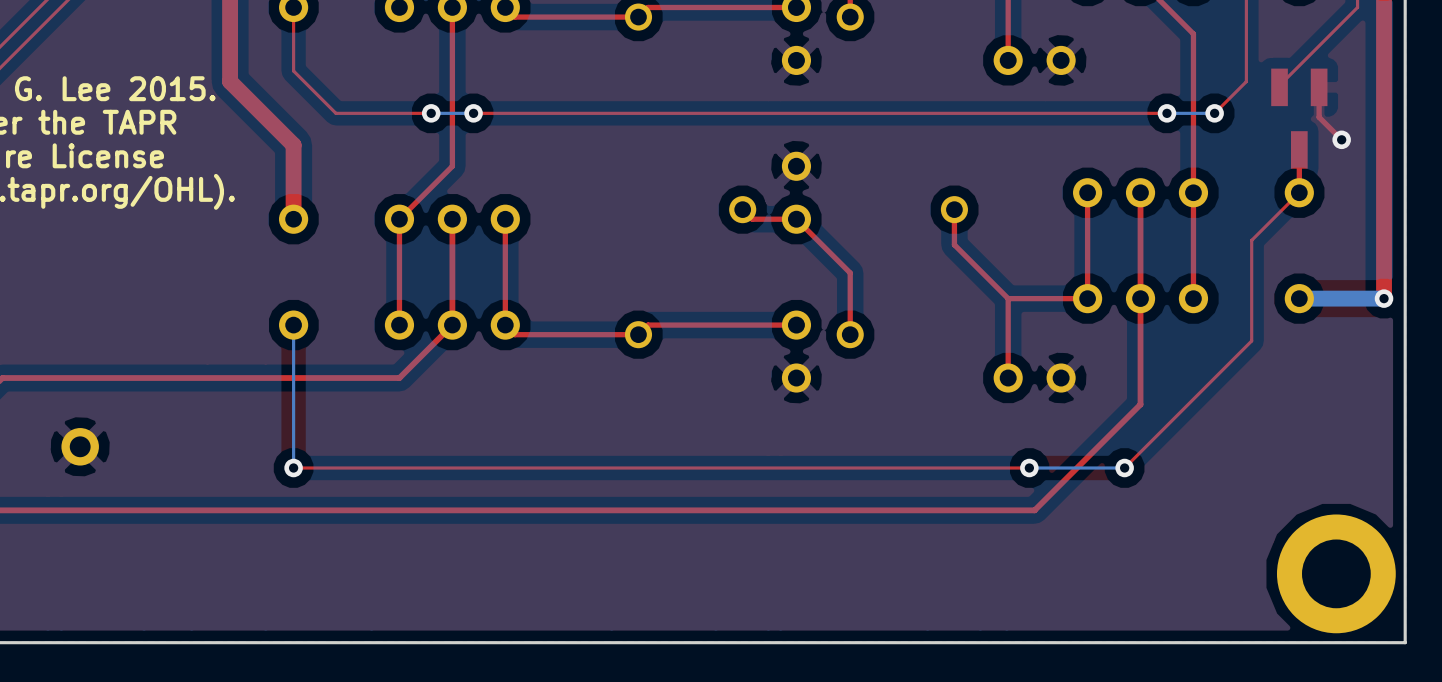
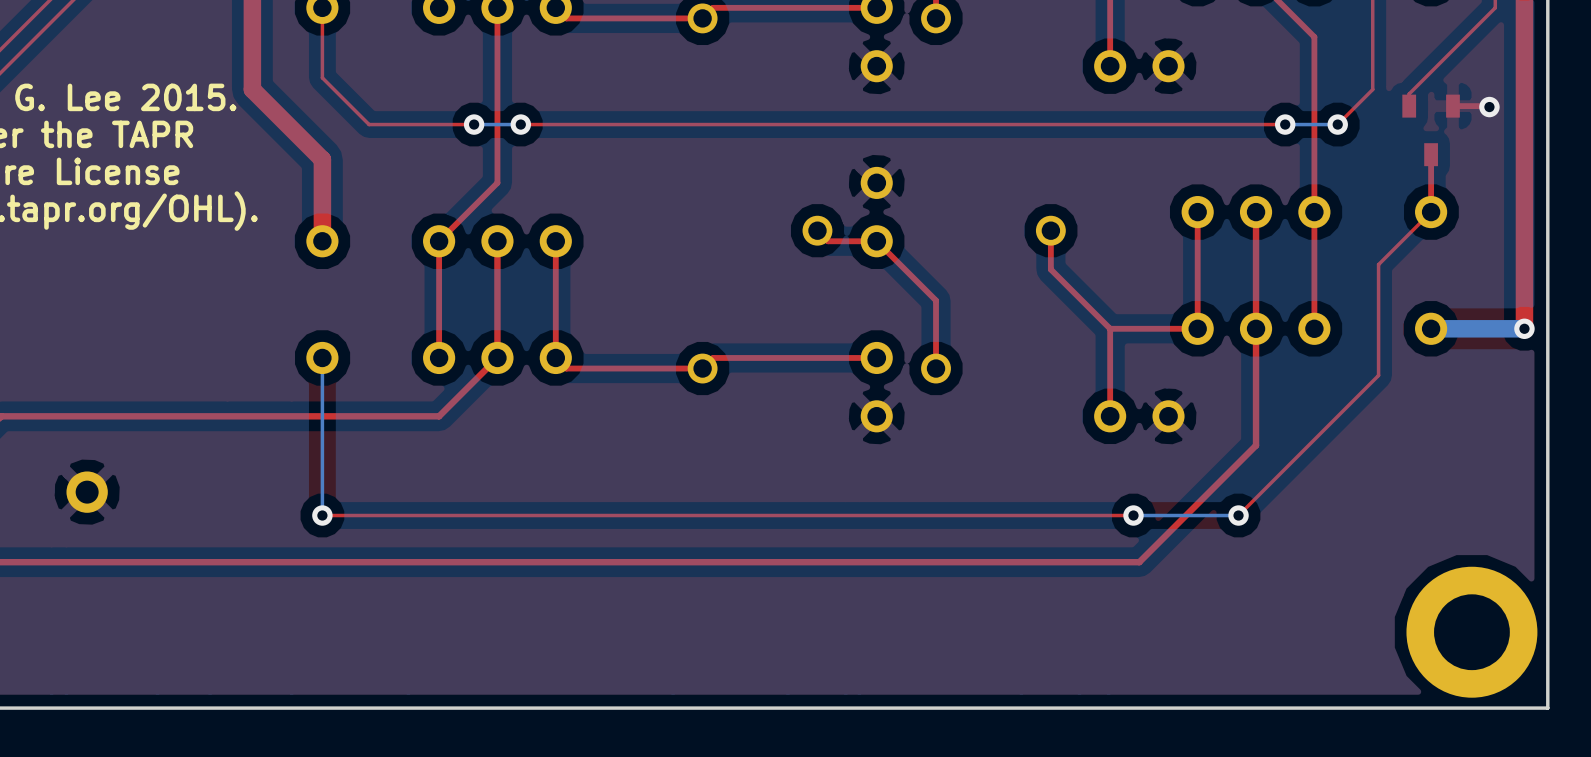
part footprint: [1271, 68, 1328, 169] -> [1402, 94, 1460, 167]
top track: (1319, 87) (1319, 117) (1341, 139) -> none
top track: none -> (1452, 106) (1489, 107)
via position: (1341, 139) -> (1489, 107)

